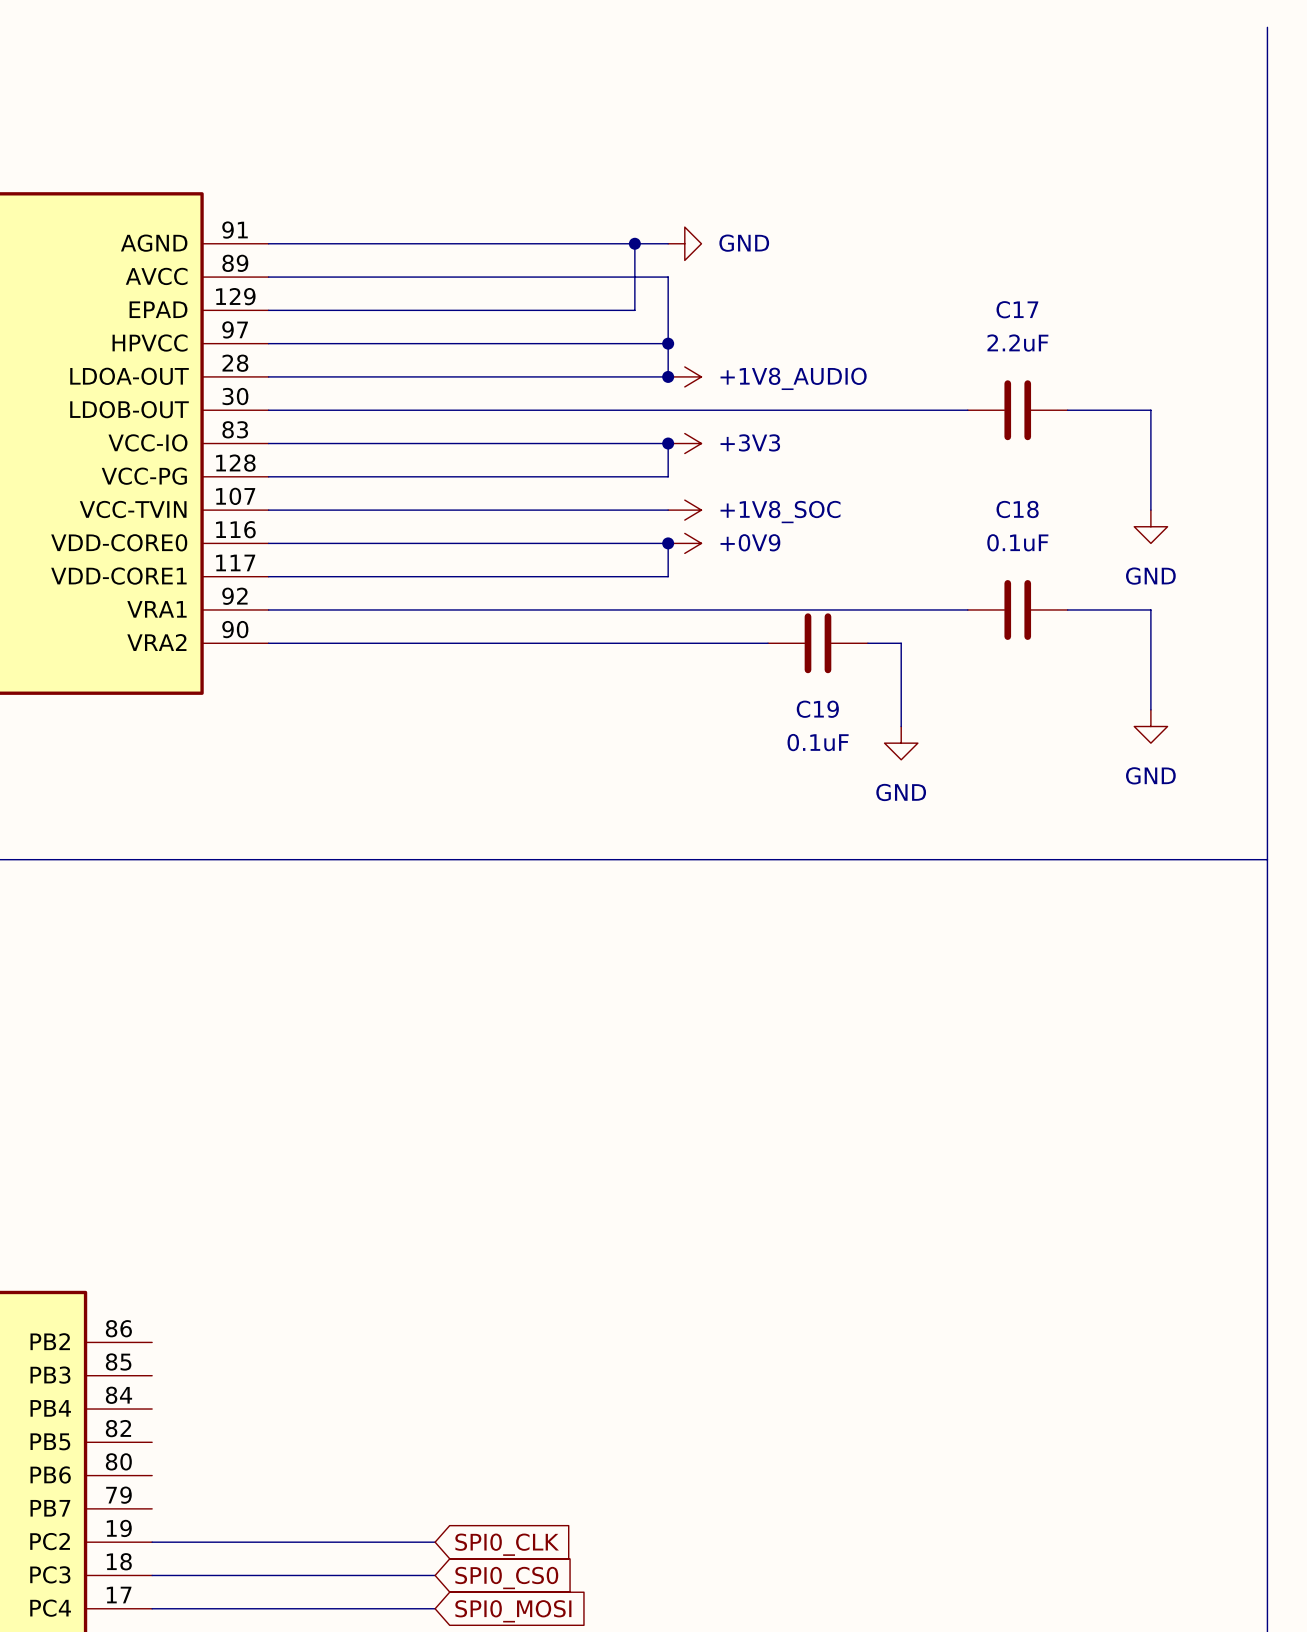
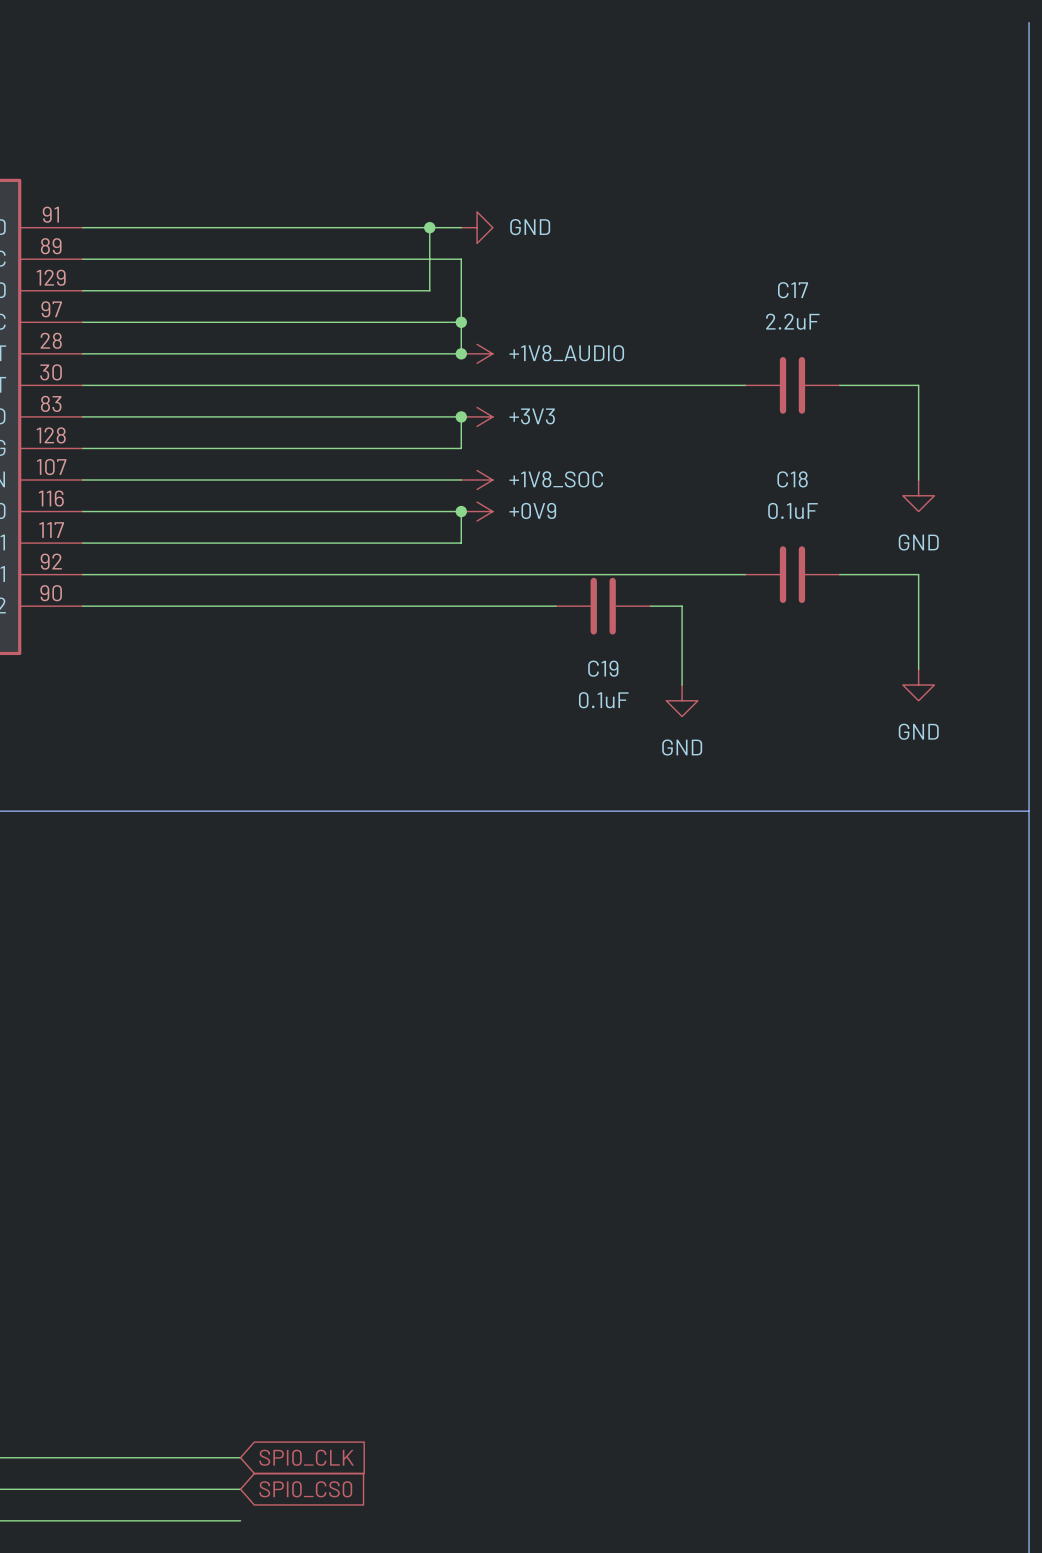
global label: SPI0_MOSI (513, 1611) -> none

